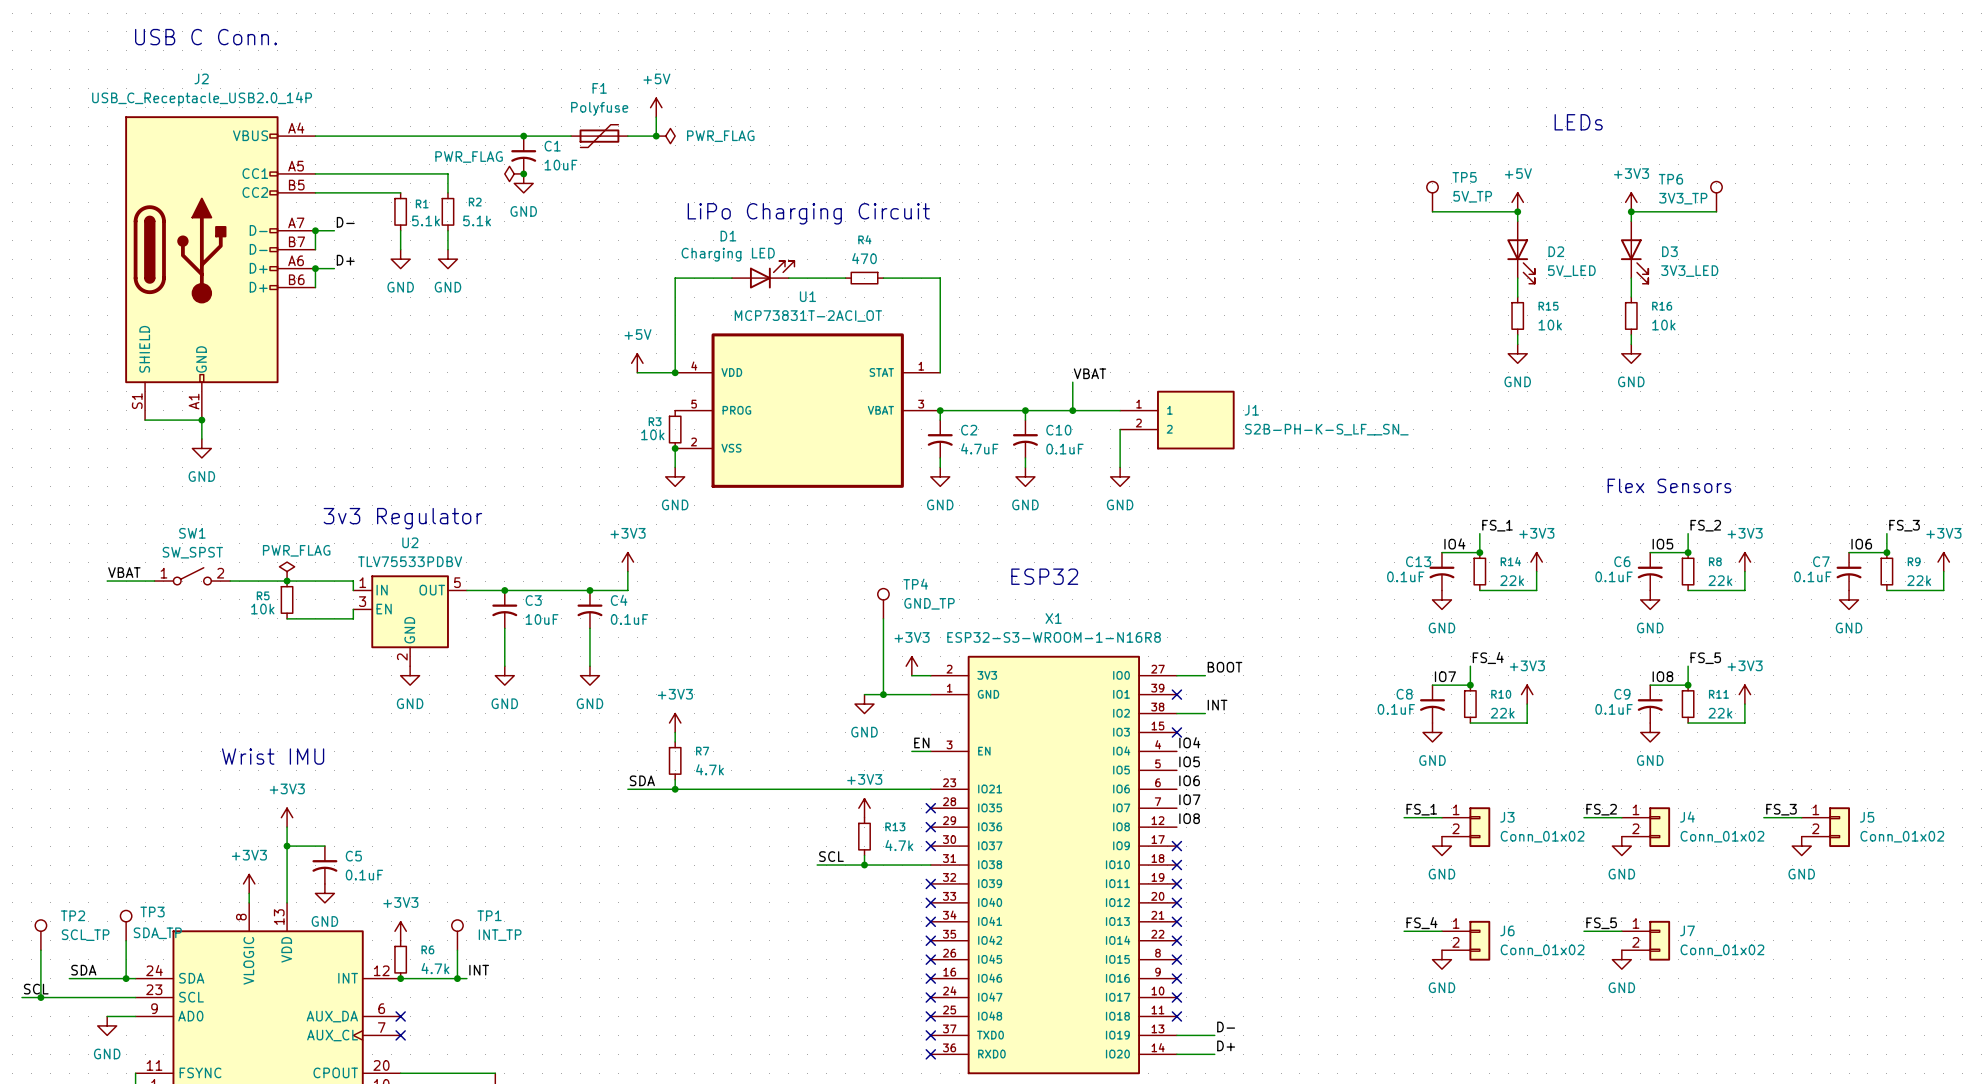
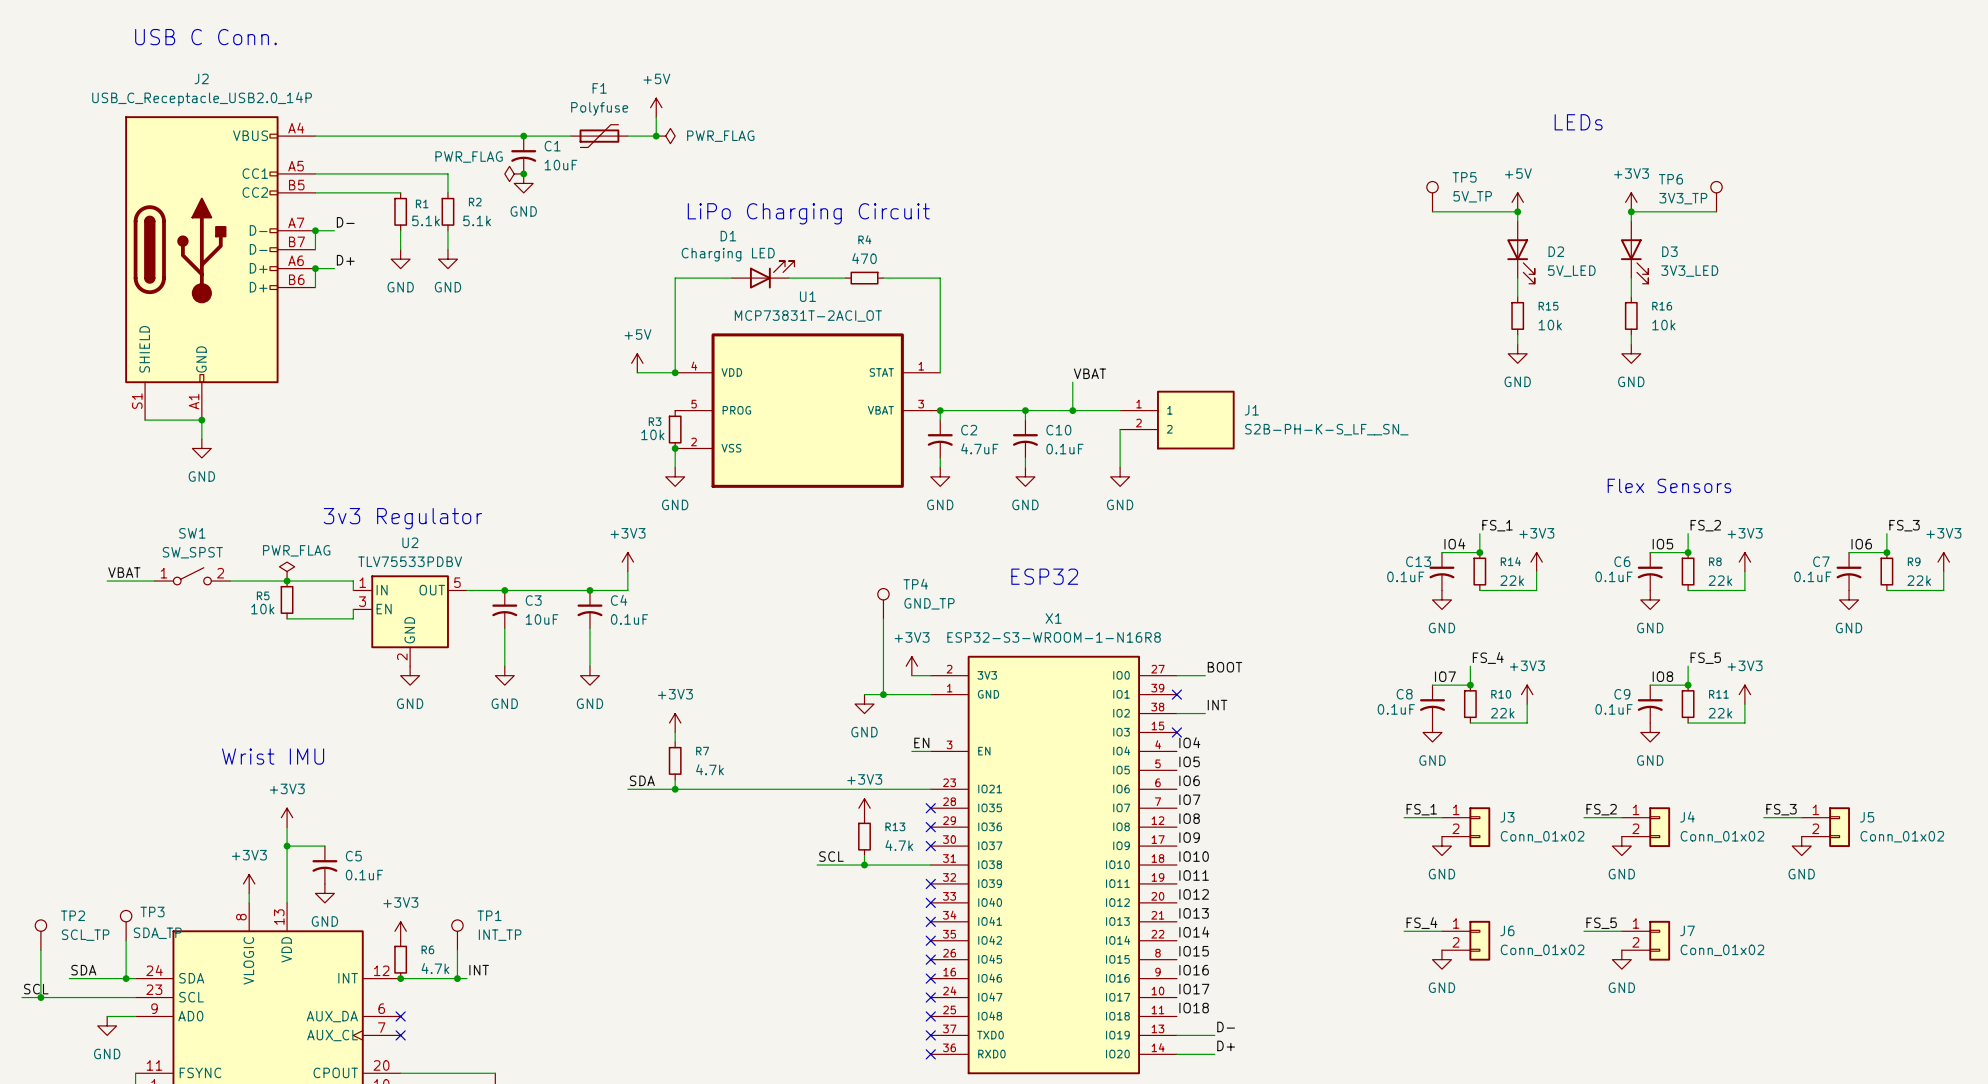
label: none -> IO9 (1189, 837)
no-connect mark: (1176, 846) -> none
label: none -> IO10 (1194, 856)
no-connect mark: (1176, 865) -> none
label: none -> IO11 (1194, 875)
no-connect mark: (1176, 883) -> none
label: none -> IO12 (1194, 894)
no-connect mark: (1176, 902) -> none
label: none -> IO13 (1194, 913)
no-connect mark: (1176, 921) -> none
label: none -> IO14 (1194, 932)
no-connect mark: (1176, 940) -> none
label: none -> IO15 (1194, 951)
no-connect mark: (1176, 959) -> none
label: none -> IO16 (1194, 970)
no-connect mark: (1176, 978) -> none
label: none -> IO17 (1194, 989)
no-connect mark: (1176, 997) -> none
label: none -> IO18 (1194, 1008)
no-connect mark: (1176, 1016) -> none

